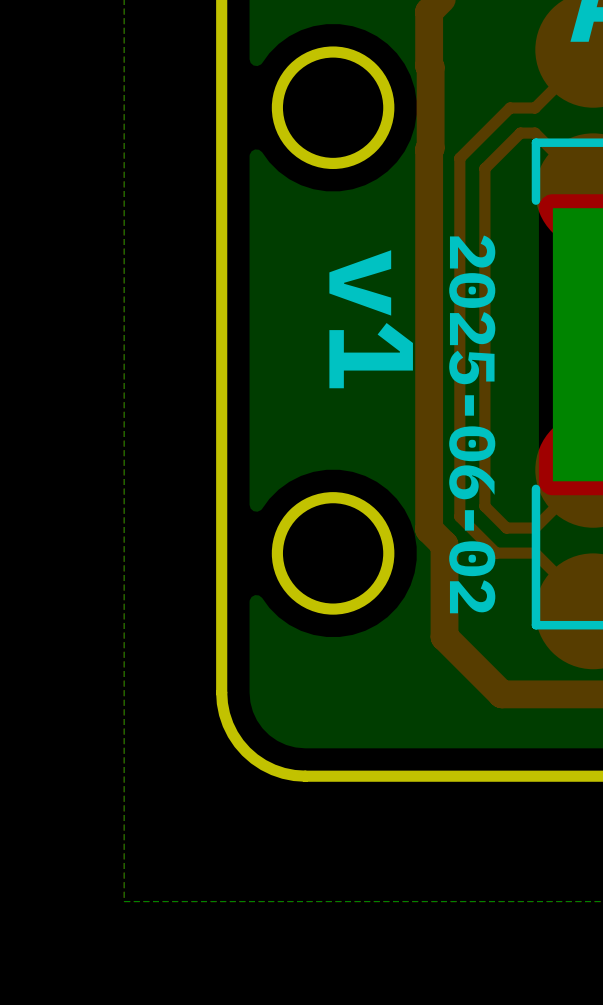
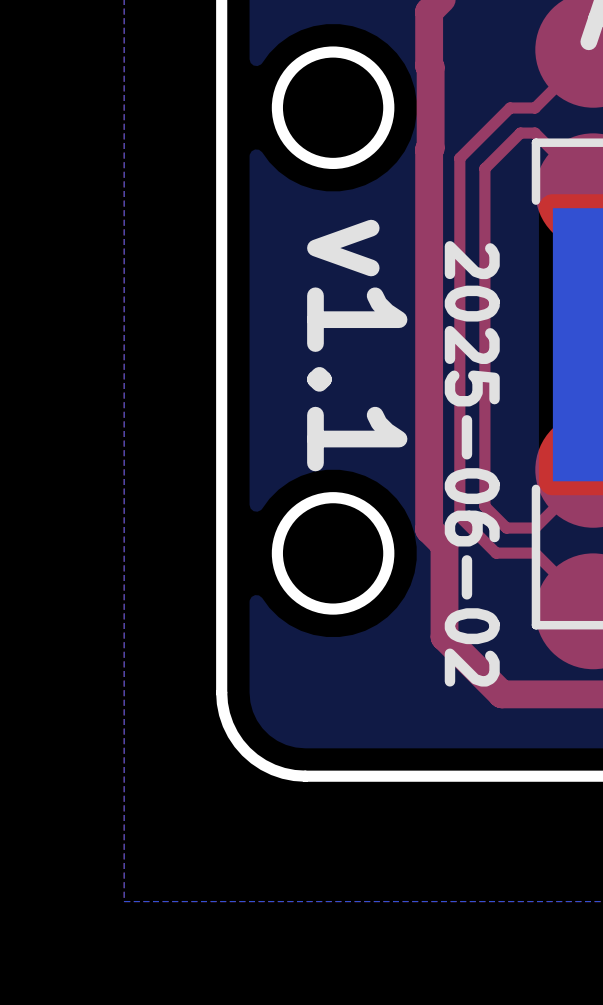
text: v1 (371, 319) -> v1.1 (357, 345)

